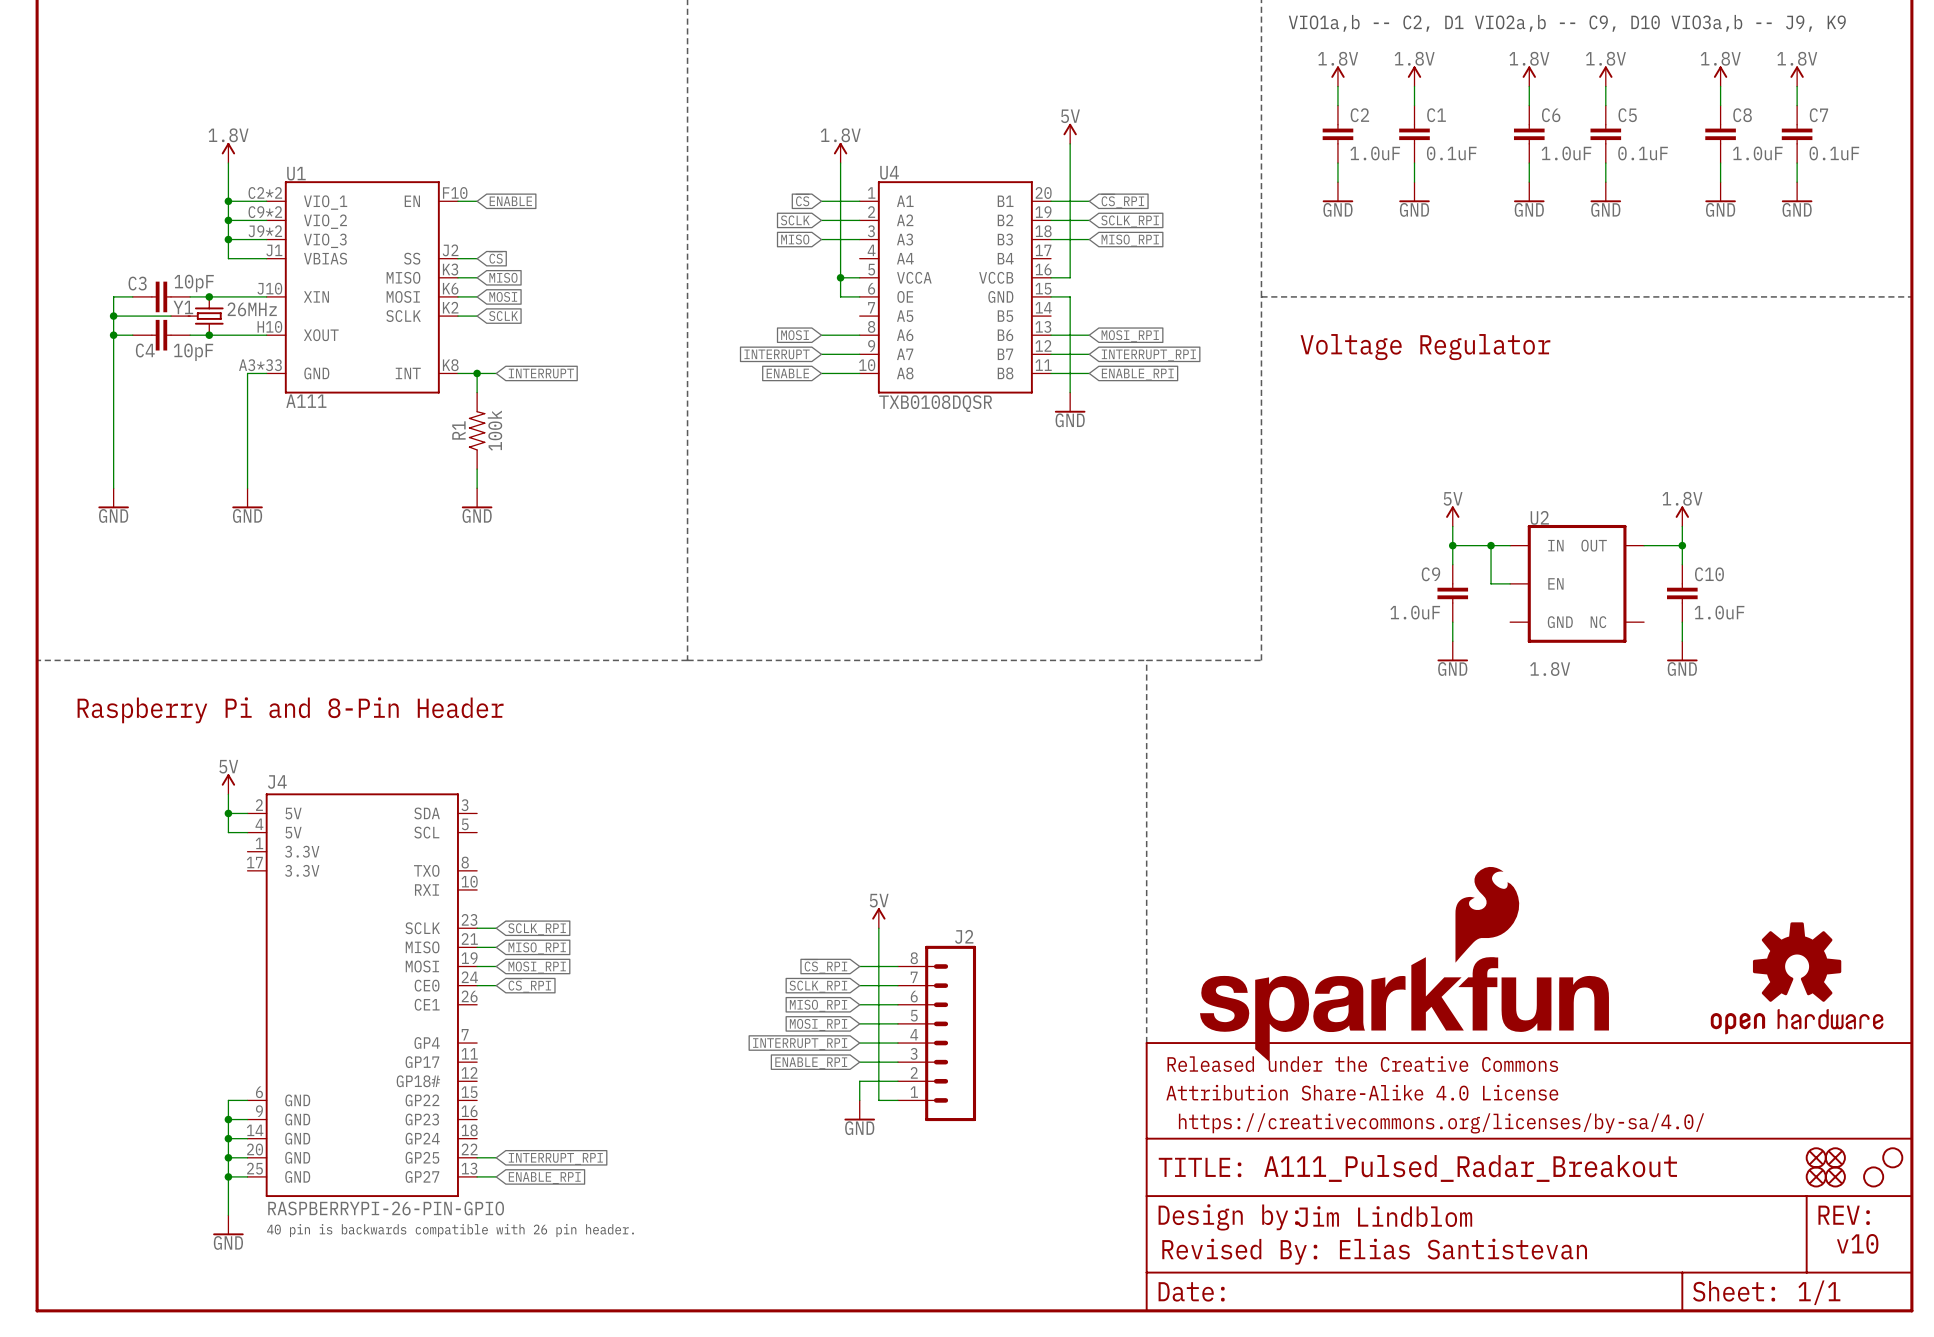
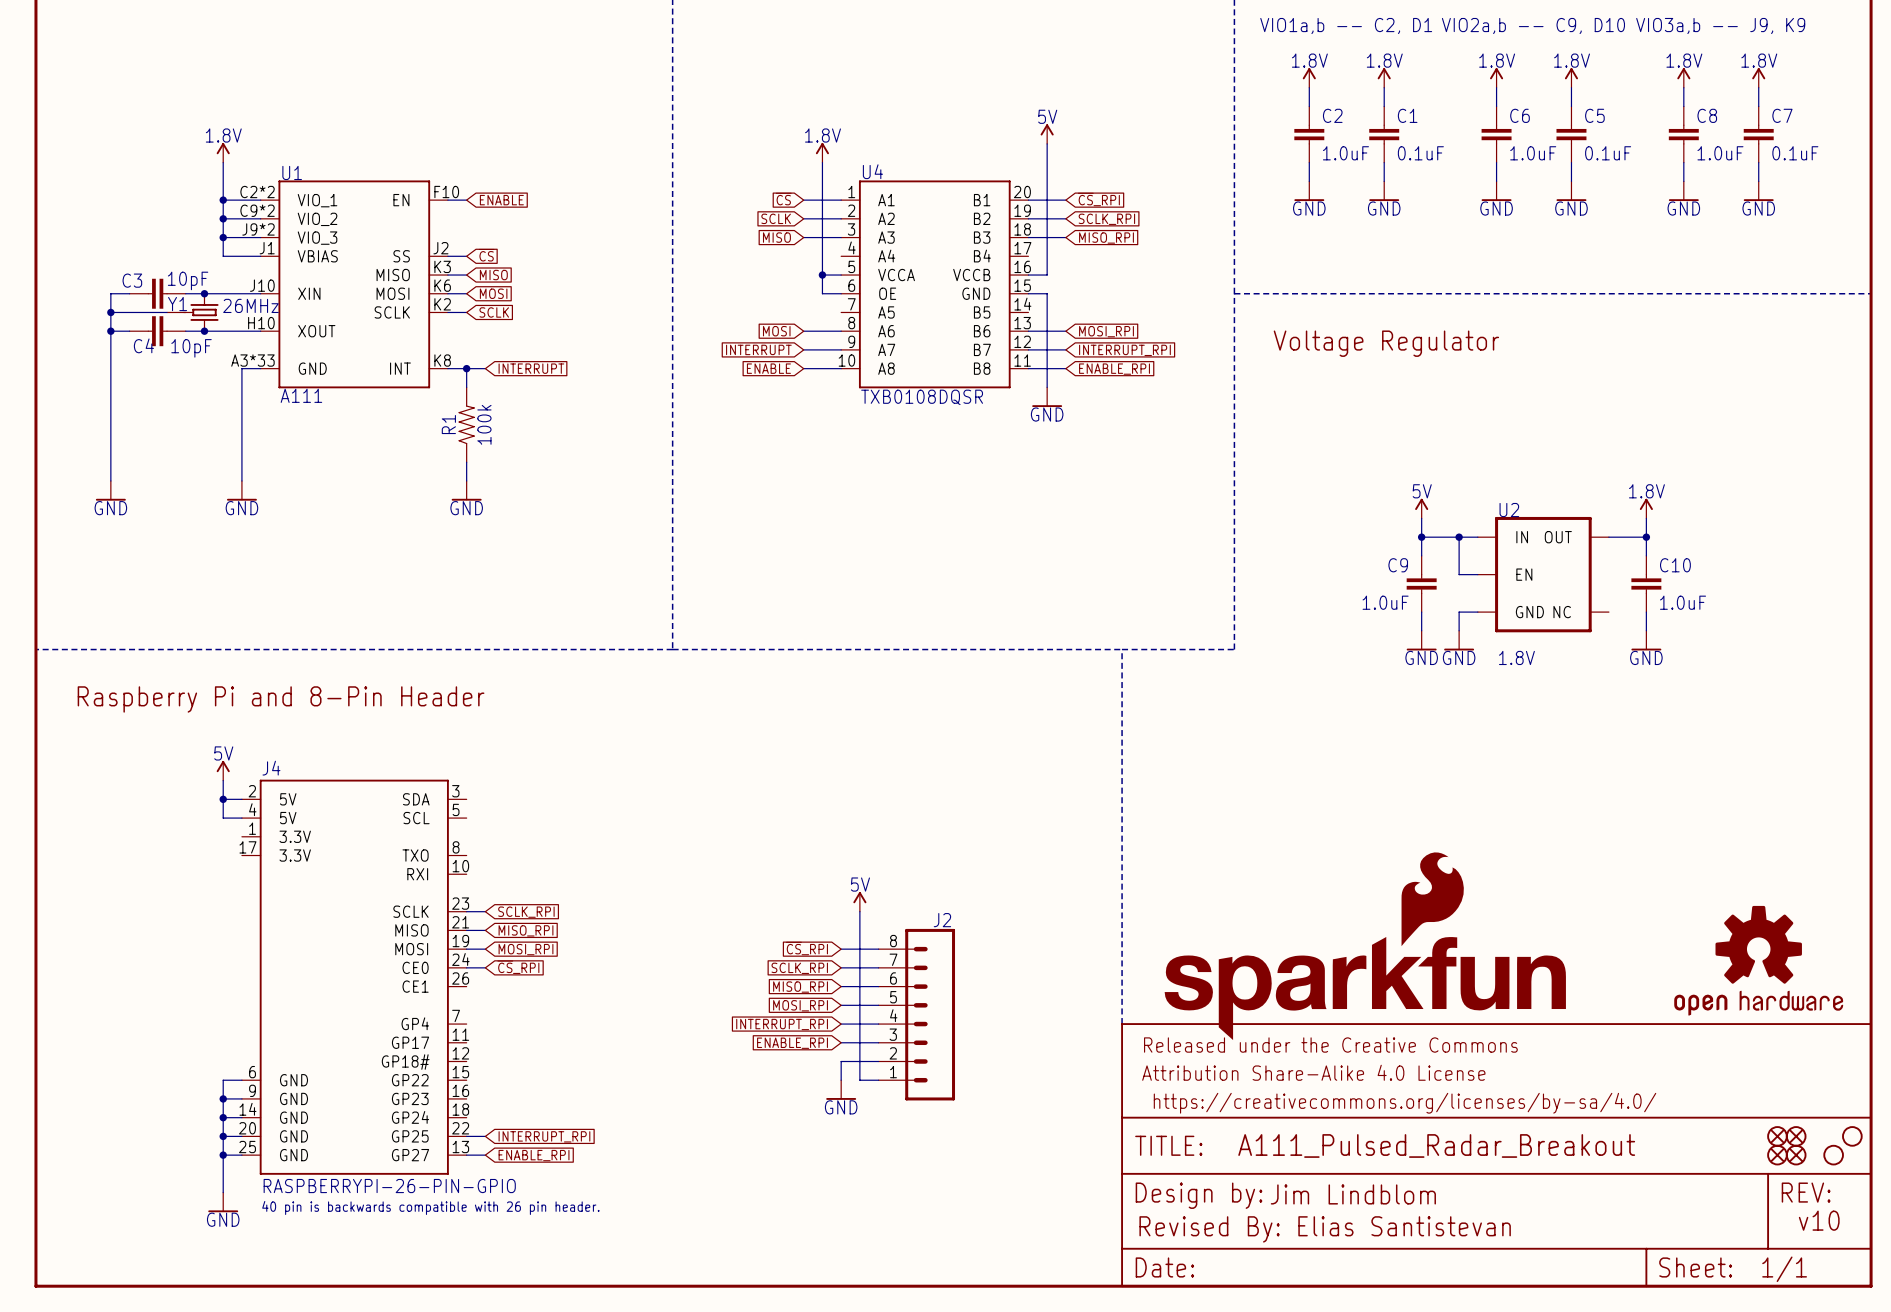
wire: none -> (1477, 612) (1459, 612) (1459, 630)
power symbol: none -> GND (1459, 640)
part: (1487, 914) -> none
part: none -> (1365, 946)
part: (1404, 1009) -> none

